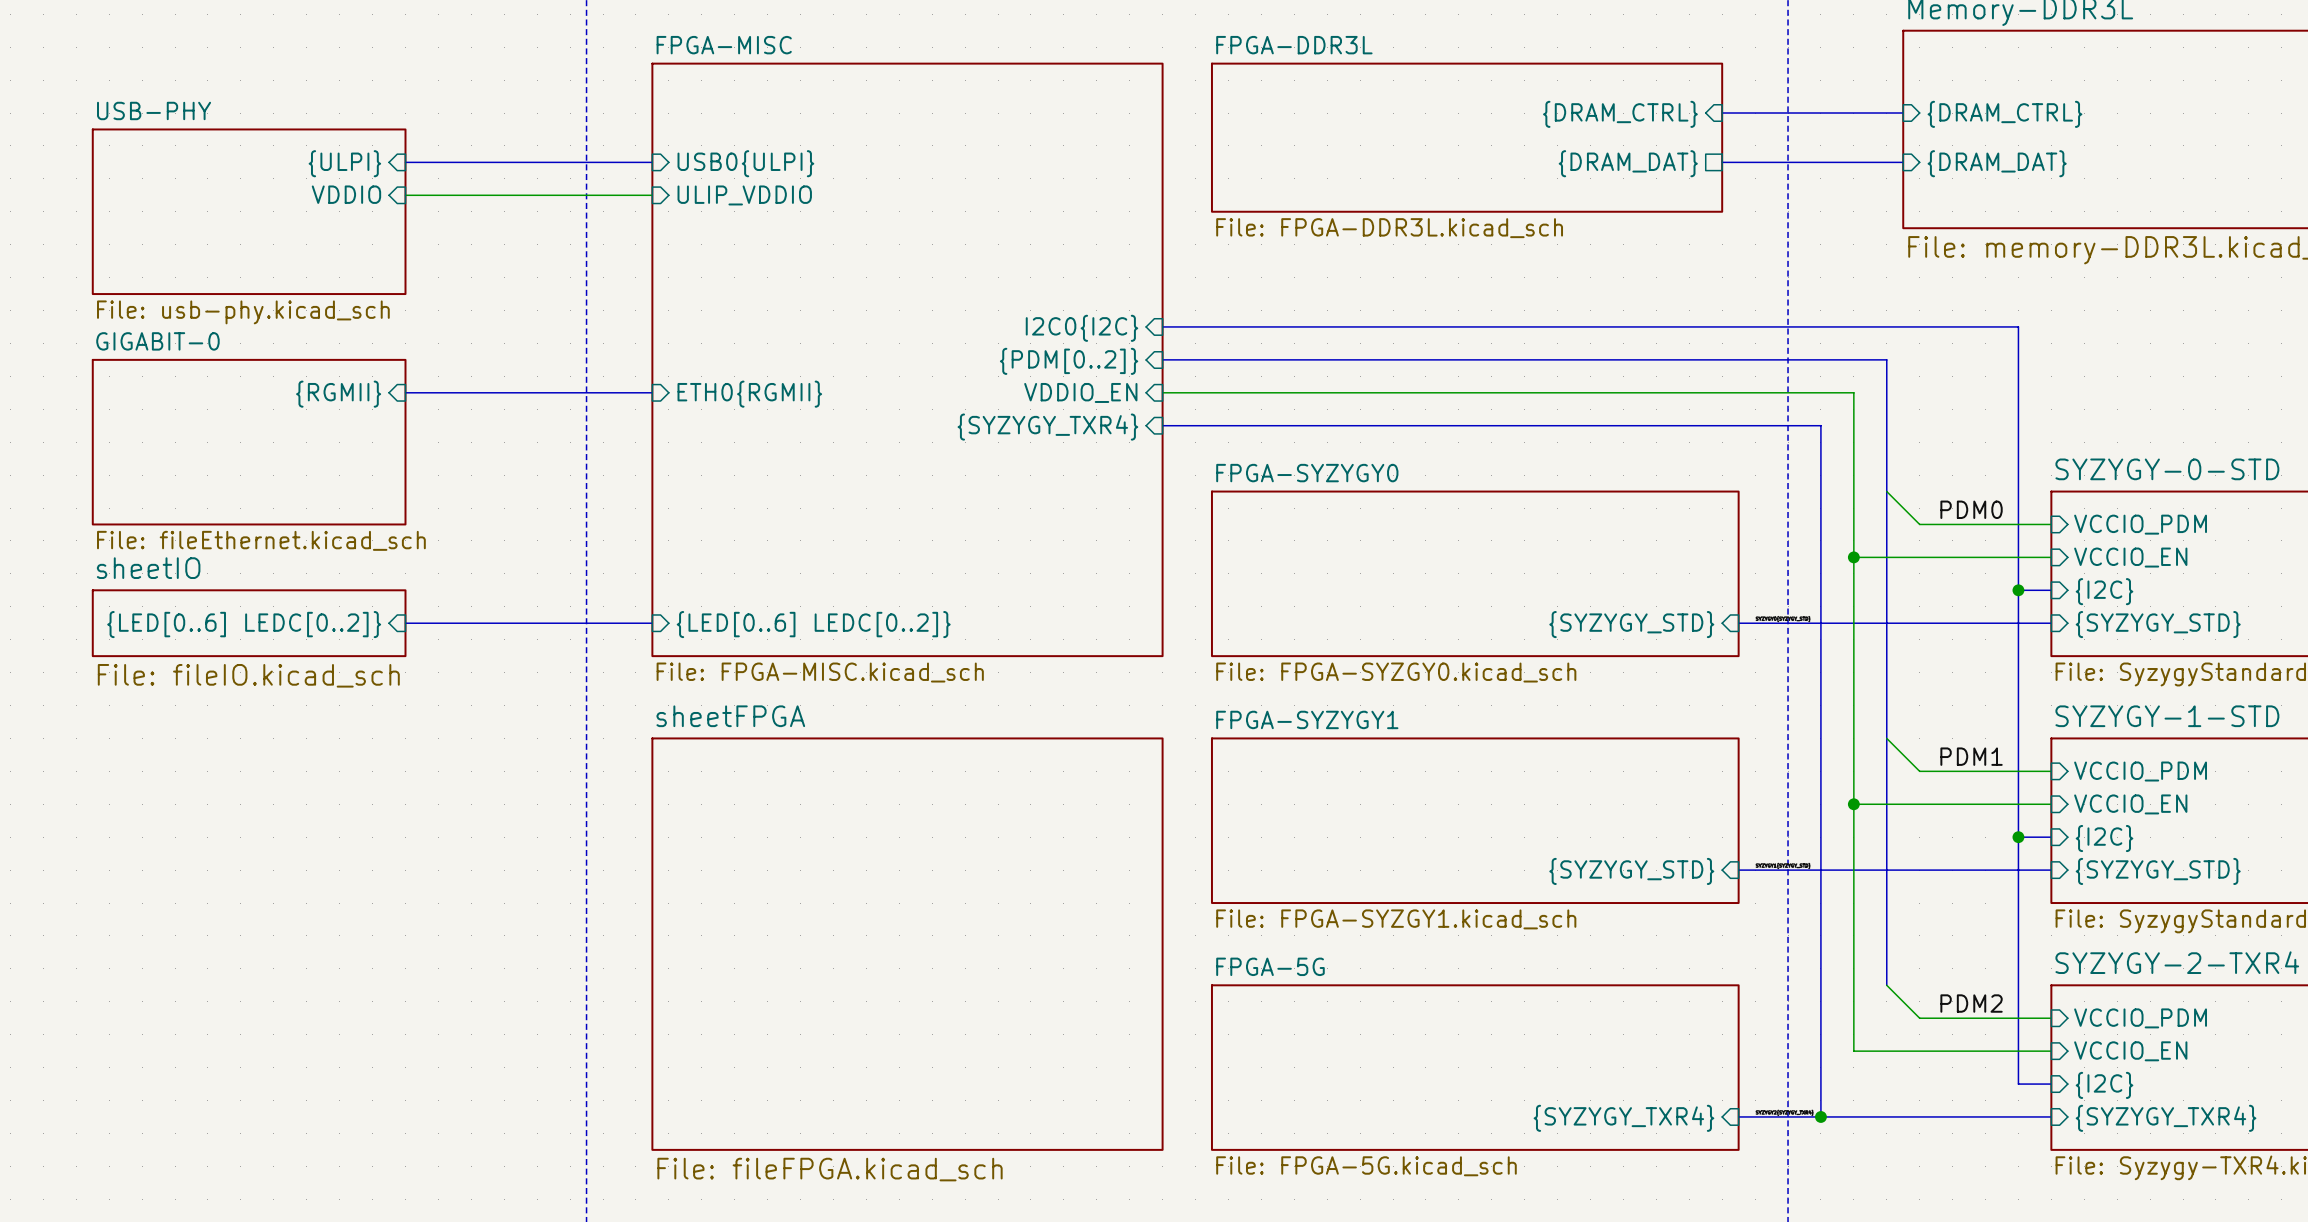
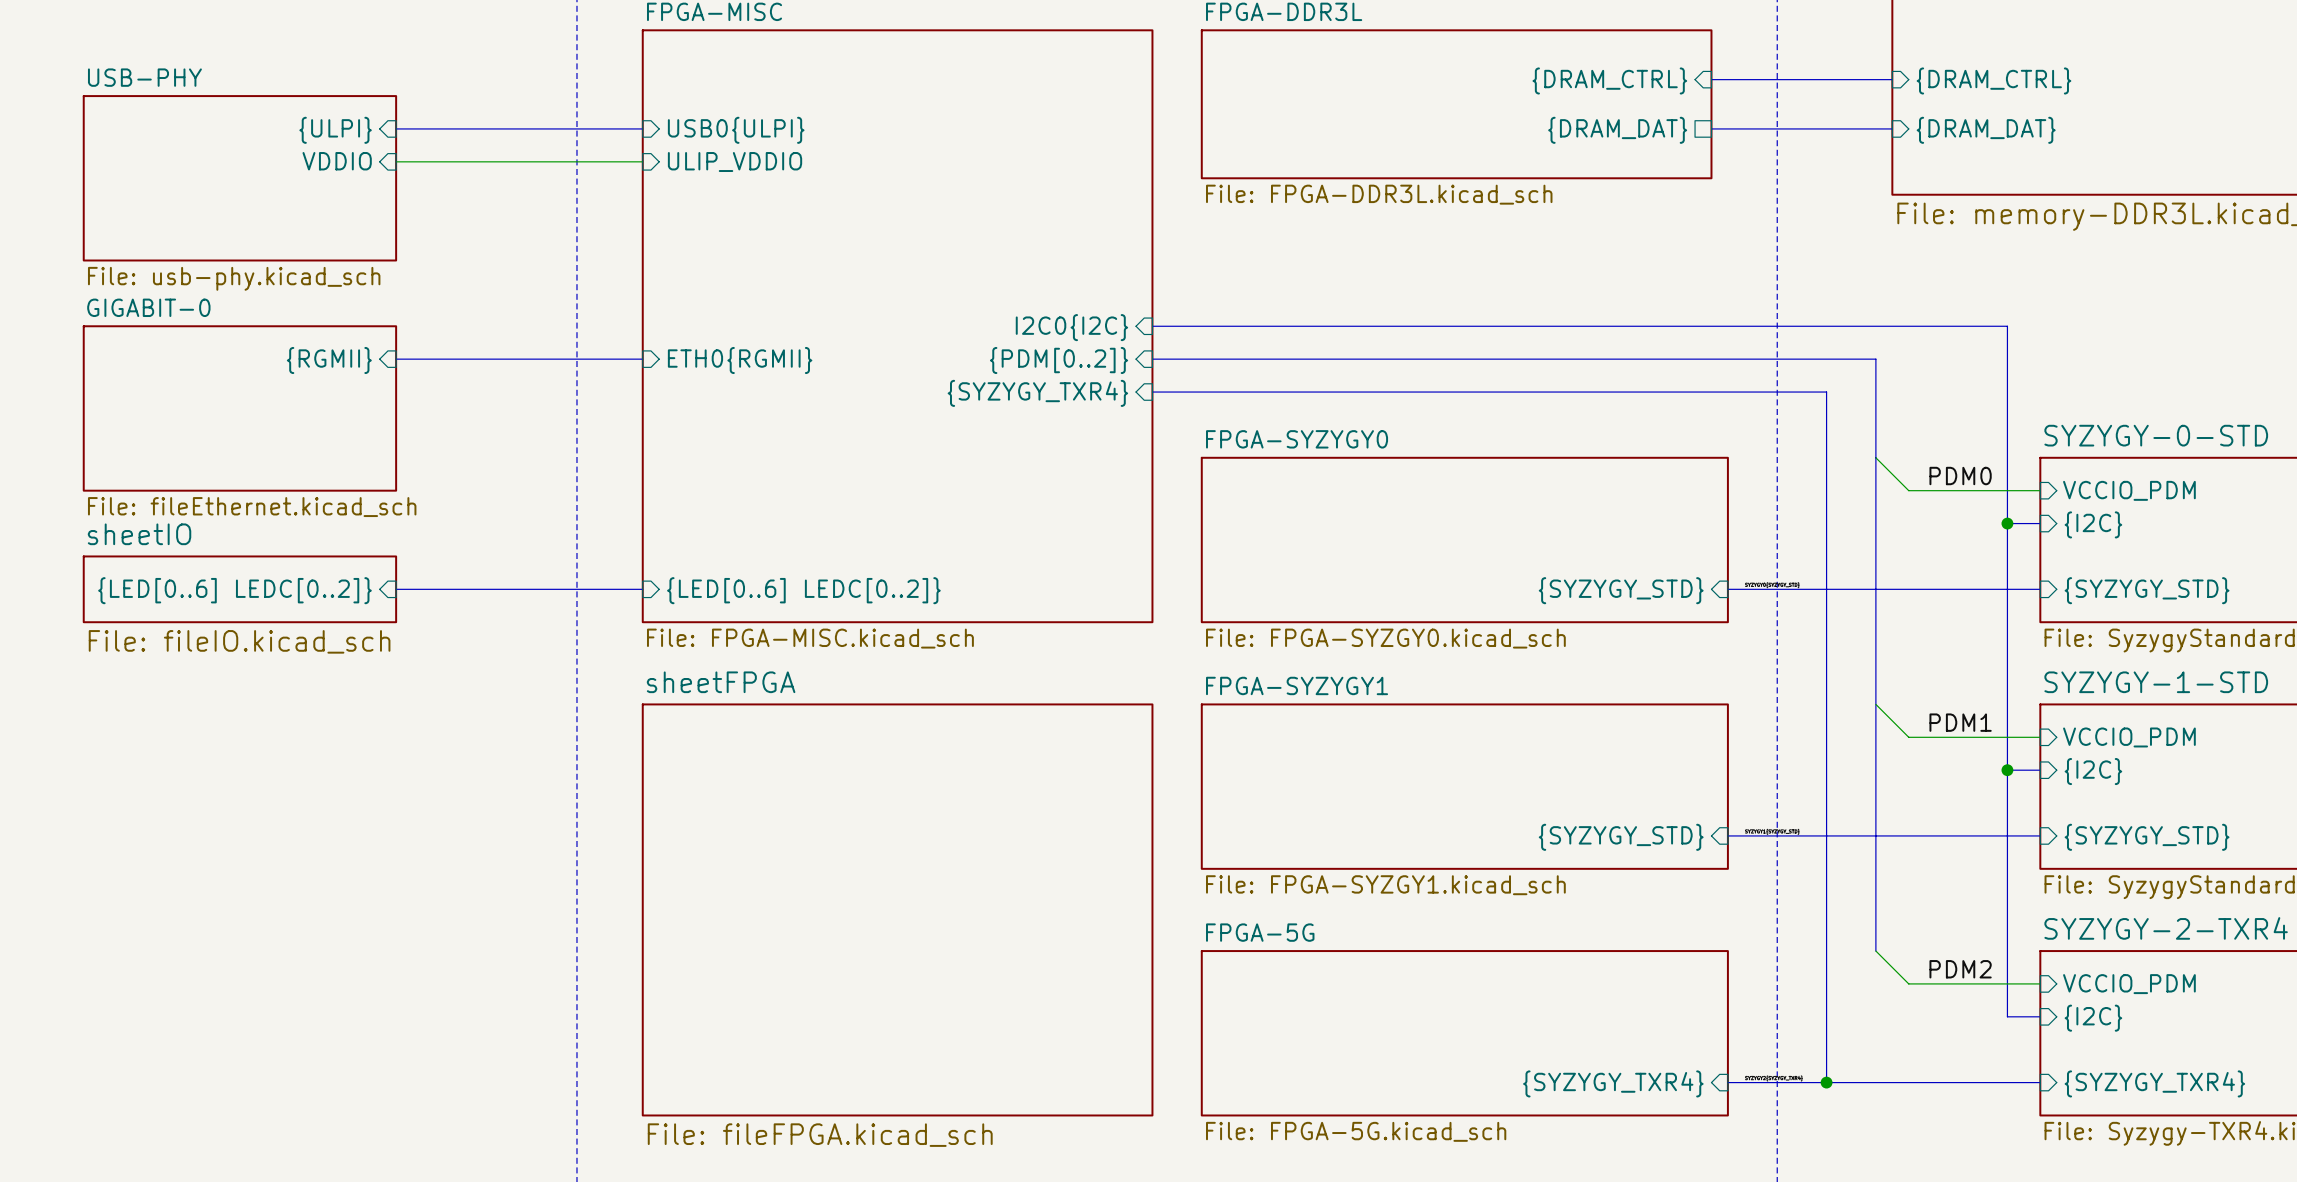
bus: (1162, 326) (2018, 326) (2018, 359) -> none
sheet pin: I2C0{I2C} (1082, 328) -> none
bus: (1886, 359) (1886, 392) -> (1875, 326) (2007, 326)
sheet pin: {PDM[0..2]} (1069, 361) -> I2C0{I2C} (1071, 327)
sheet pin: VDDIO_EN (1080, 392) -> {PDM[0..2]} (1059, 360)
wire: (1162, 392) (1853, 392) (1853, 1051) (2051, 1051) -> none
bus: none -> (1152, 359) (1875, 359)
bus: (1820, 425) (1820, 1116) -> (1810, 392) (1826, 392) (1826, 1082)
wire: (1853, 557) (2051, 557) -> none
junction: (1853, 557) -> none
sheet pin: VCCIO_EN (2130, 557) -> {I2C} (2093, 524)
bus: (2018, 590) (2051, 590) -> (2007, 523) (2040, 523)
junction position: (2018, 590) -> (2007, 523)
sheet pin: {I2C} (2104, 591) -> none
wire: (1853, 804) (2051, 804) -> none
junction: (1853, 804) -> none
sheet pin: VCCIO_EN (2130, 804) -> {I2C} (2093, 771)
bus: (2018, 837) (2051, 837) -> (2007, 770) (2040, 770)
junction position: (2018, 837) -> (2007, 770)
sheet pin: {I2C} (2104, 838) -> none
bus: (2018, 1051) (2018, 1084) (2051, 1084) -> (2007, 1016) (2040, 1016)
sheet pin: VCCIO_EN (2130, 1051) -> {I2C} (2093, 1018)
sheet pin: {I2C} (2104, 1085) -> none
junction position: (1820, 1116) -> (1826, 1082)

